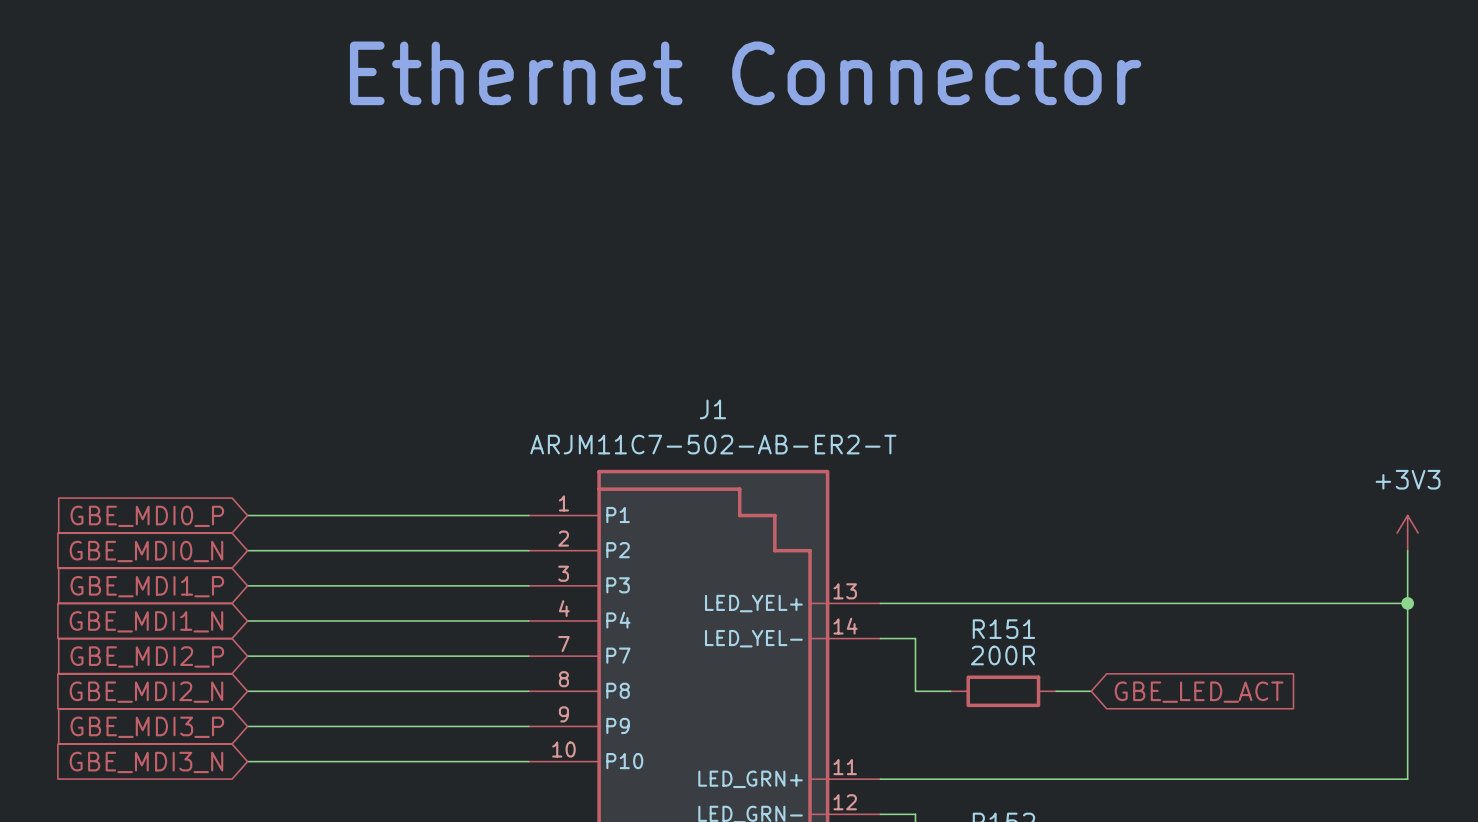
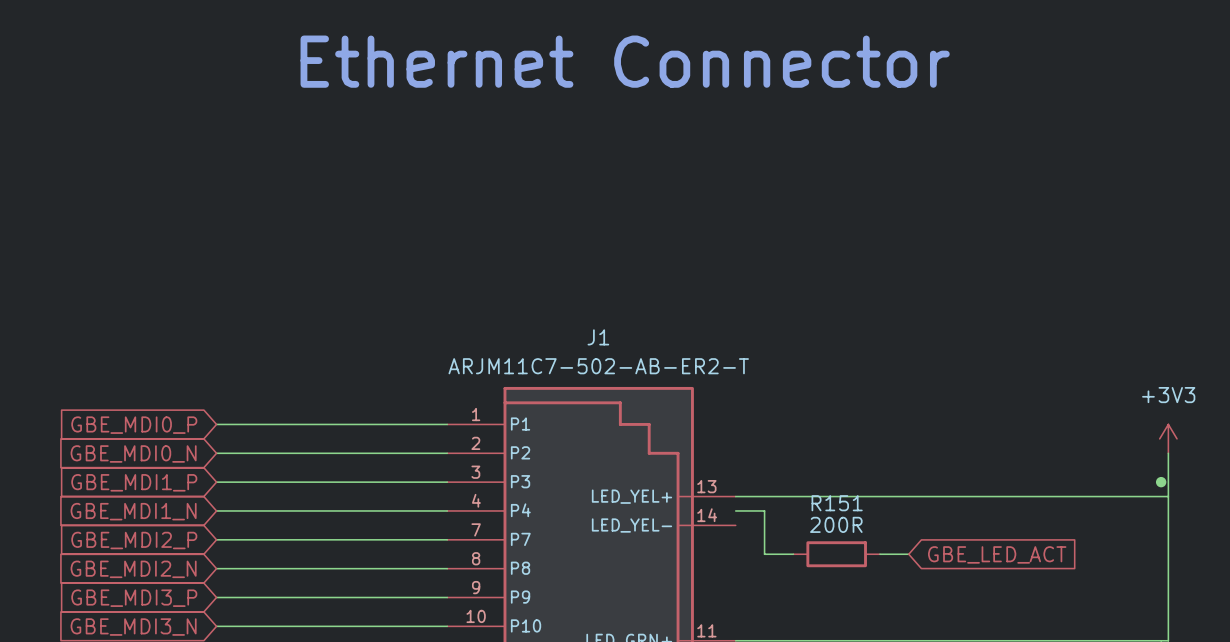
junction position: (1407, 603) -> (1161, 482)
wire: (880, 638) (915, 638) -> (735, 510) (764, 510) (764, 525)
wire: (915, 673) (915, 691) (950, 691) -> (764, 554) (793, 554)
R151 position: (1003, 691) -> (836, 554)
wire: (1056, 691) (1091, 691) -> (879, 554) (908, 554)
global label position: GBE_LED_ACT (1199, 692) -> GBE_LED_ACT (997, 554)

